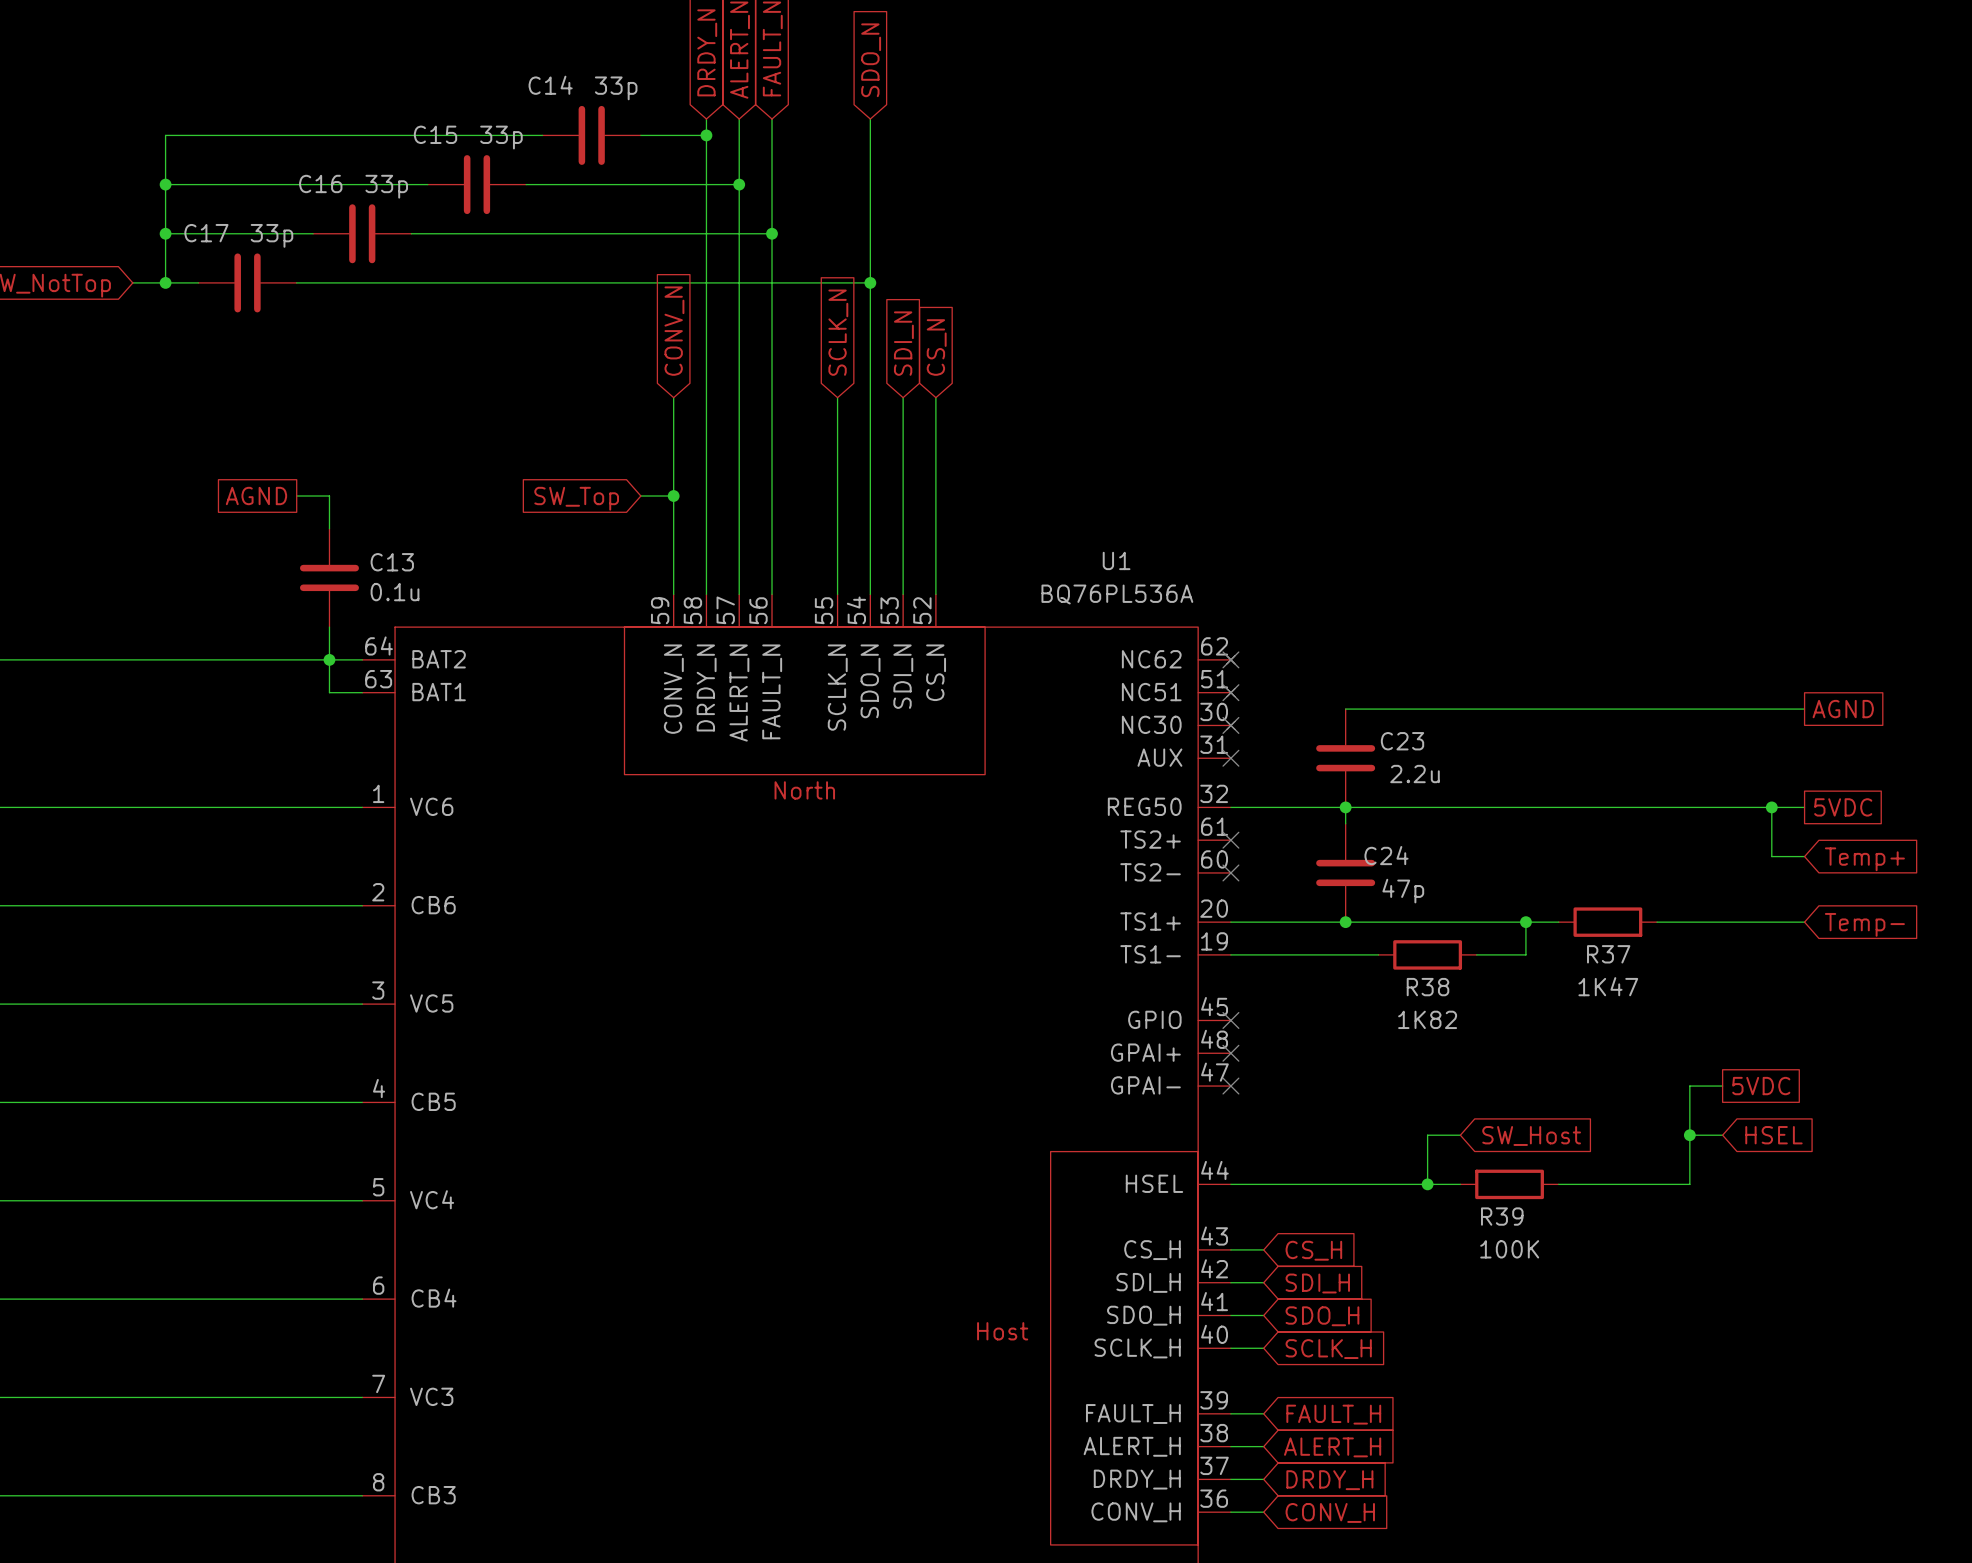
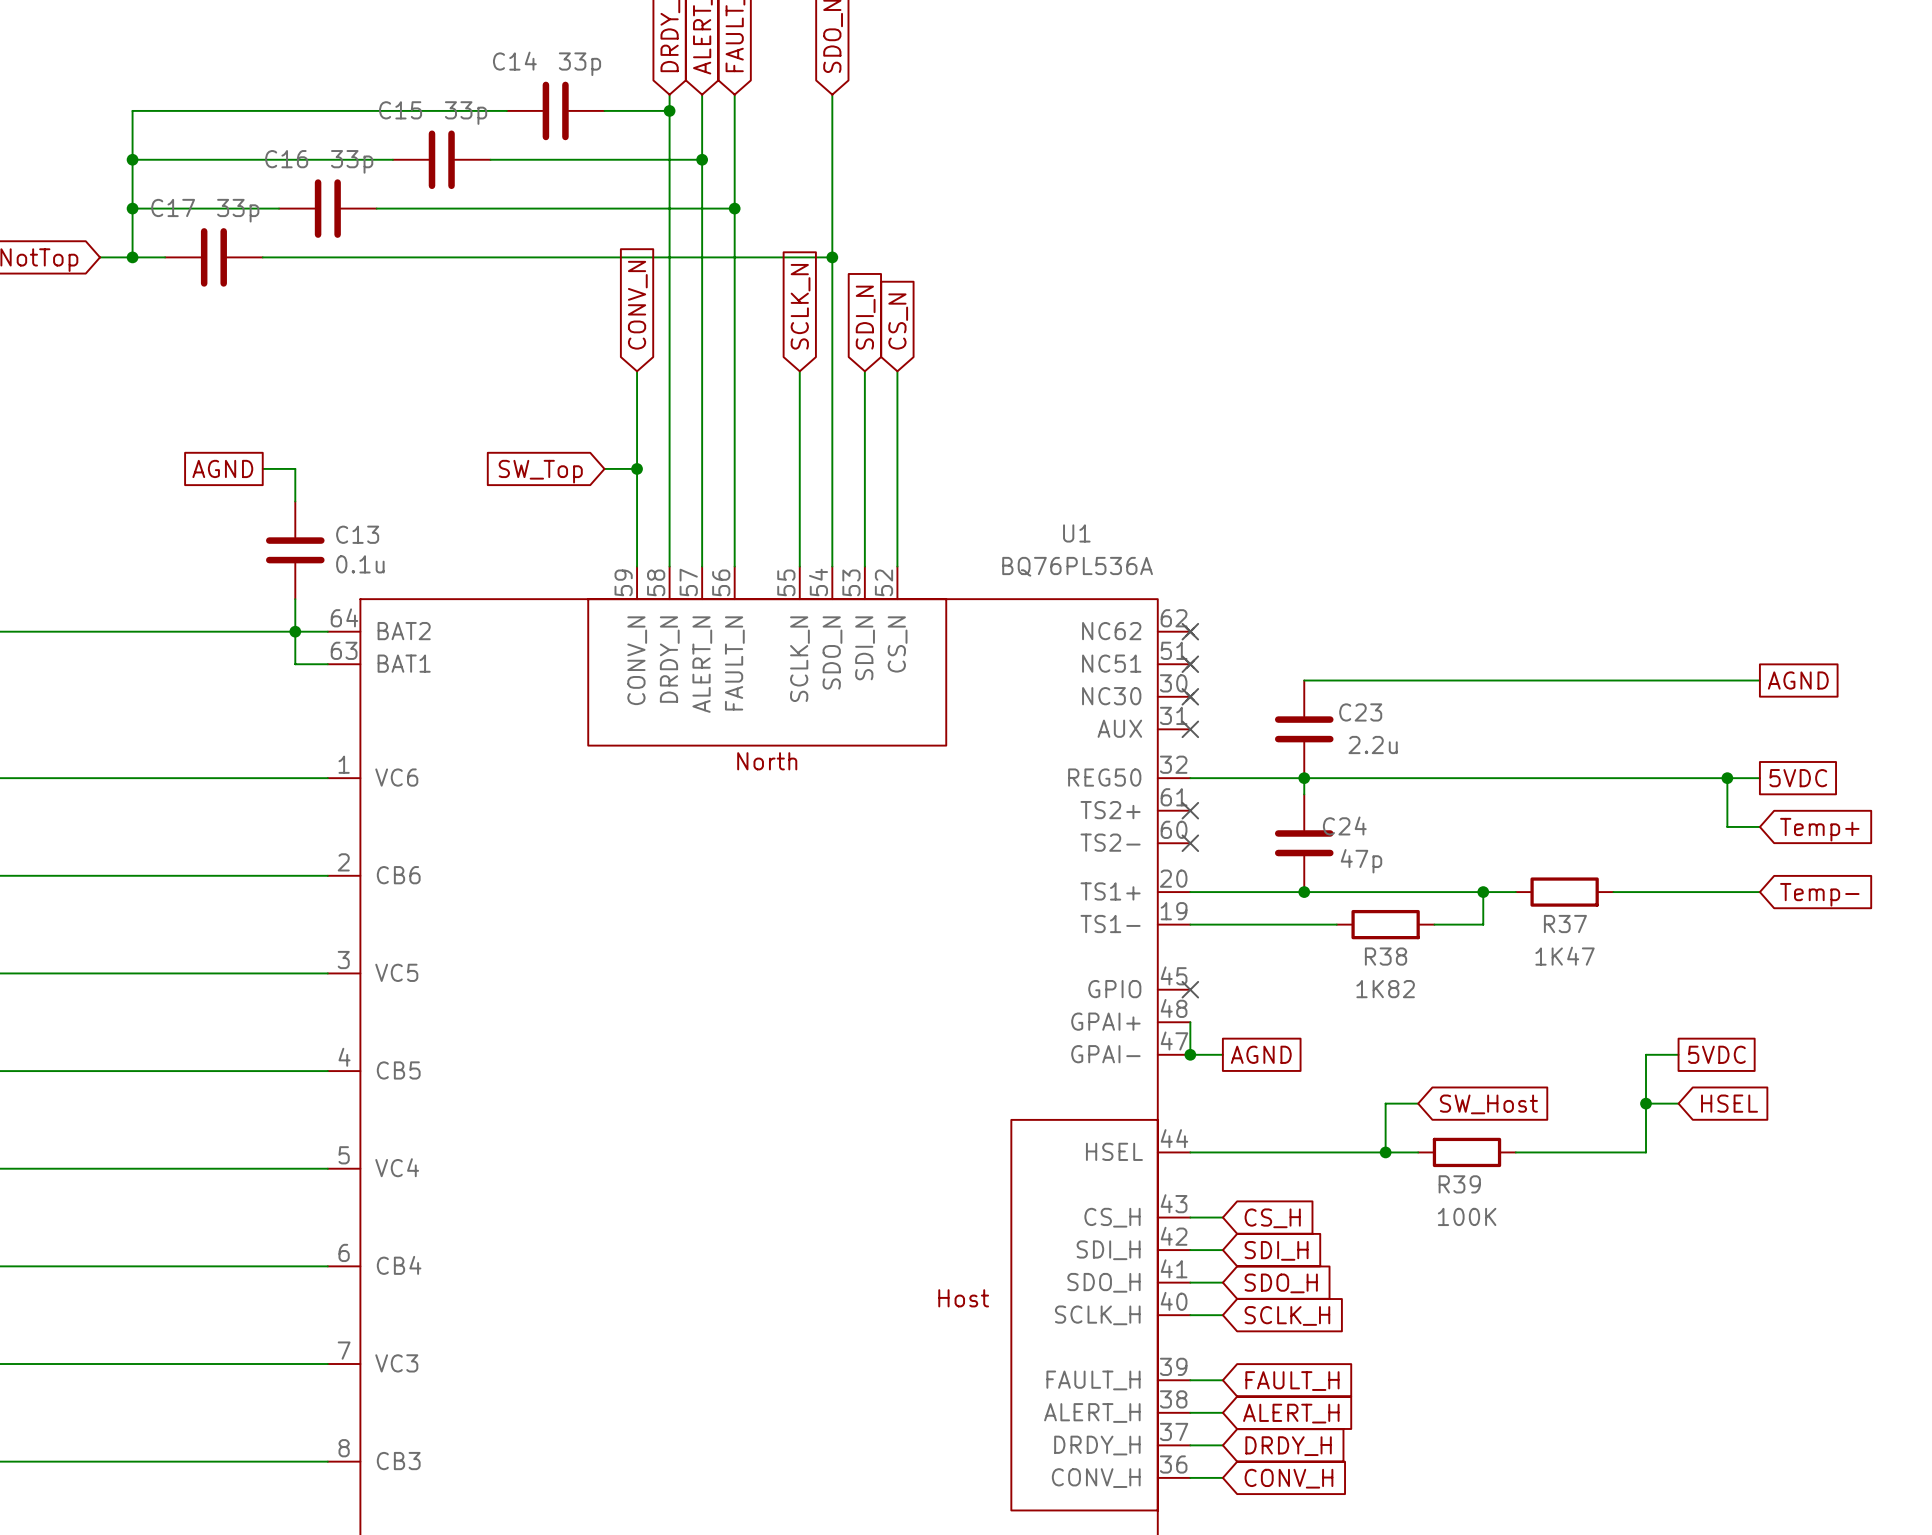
wire: none -> (1190, 1022) (1190, 1054) (1222, 1054)
no-connect mark: (1230, 1053) -> none
no-connect mark: (1230, 1086) -> none
junction: none -> (1190, 1054)
global label: none -> AGND (1261, 1054)

